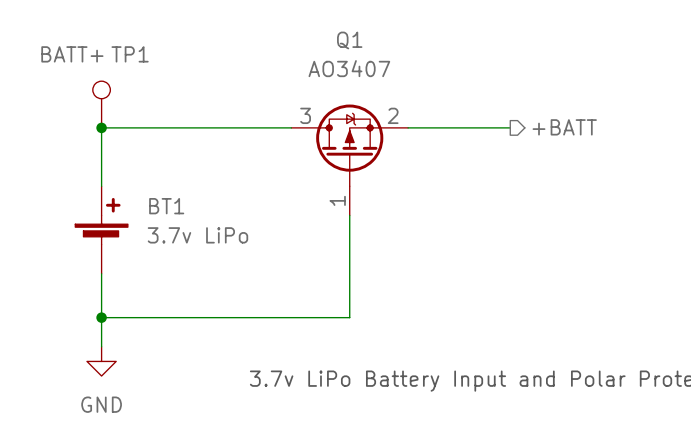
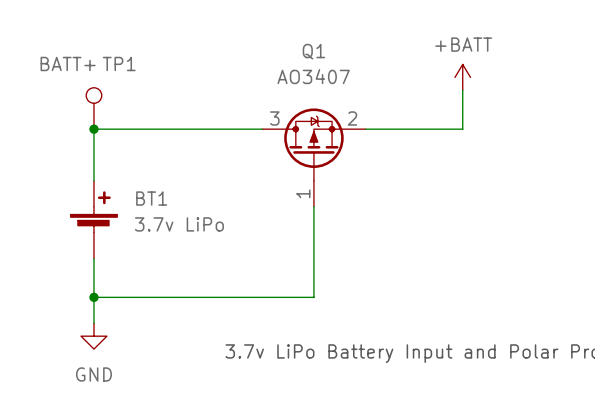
power symbol: none -> +BATT (462, 77)
wire: none -> (462, 90) (462, 129) (456, 129)
hierarchical label: +BATT (564, 127) -> none

